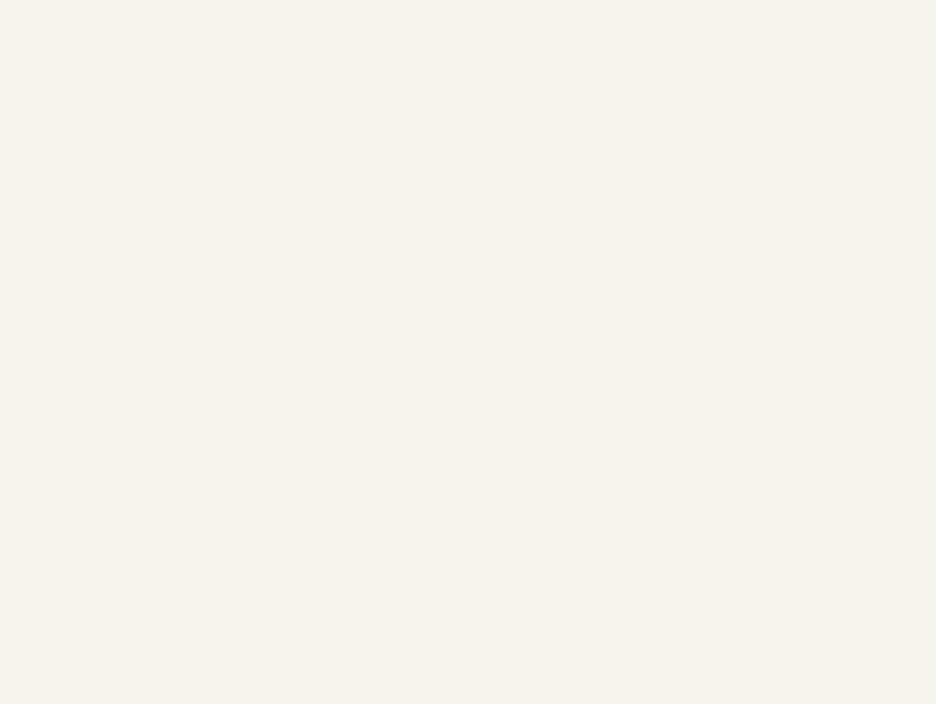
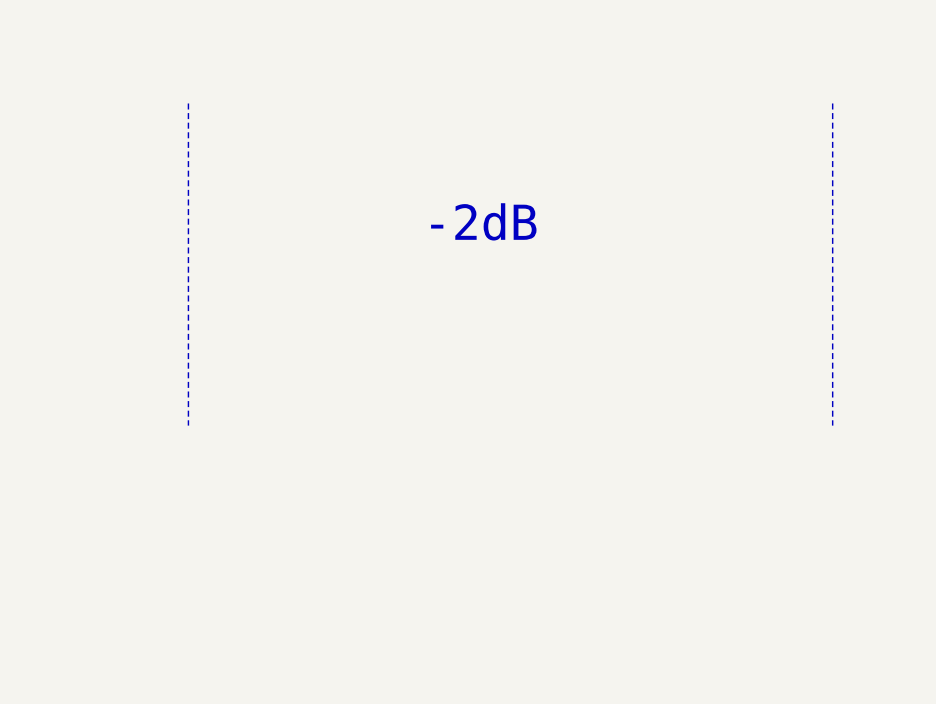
line: none -> (188, 103) (188, 425)
line: none -> (832, 103) (832, 425)
text: none -> -2dB (483, 221)

